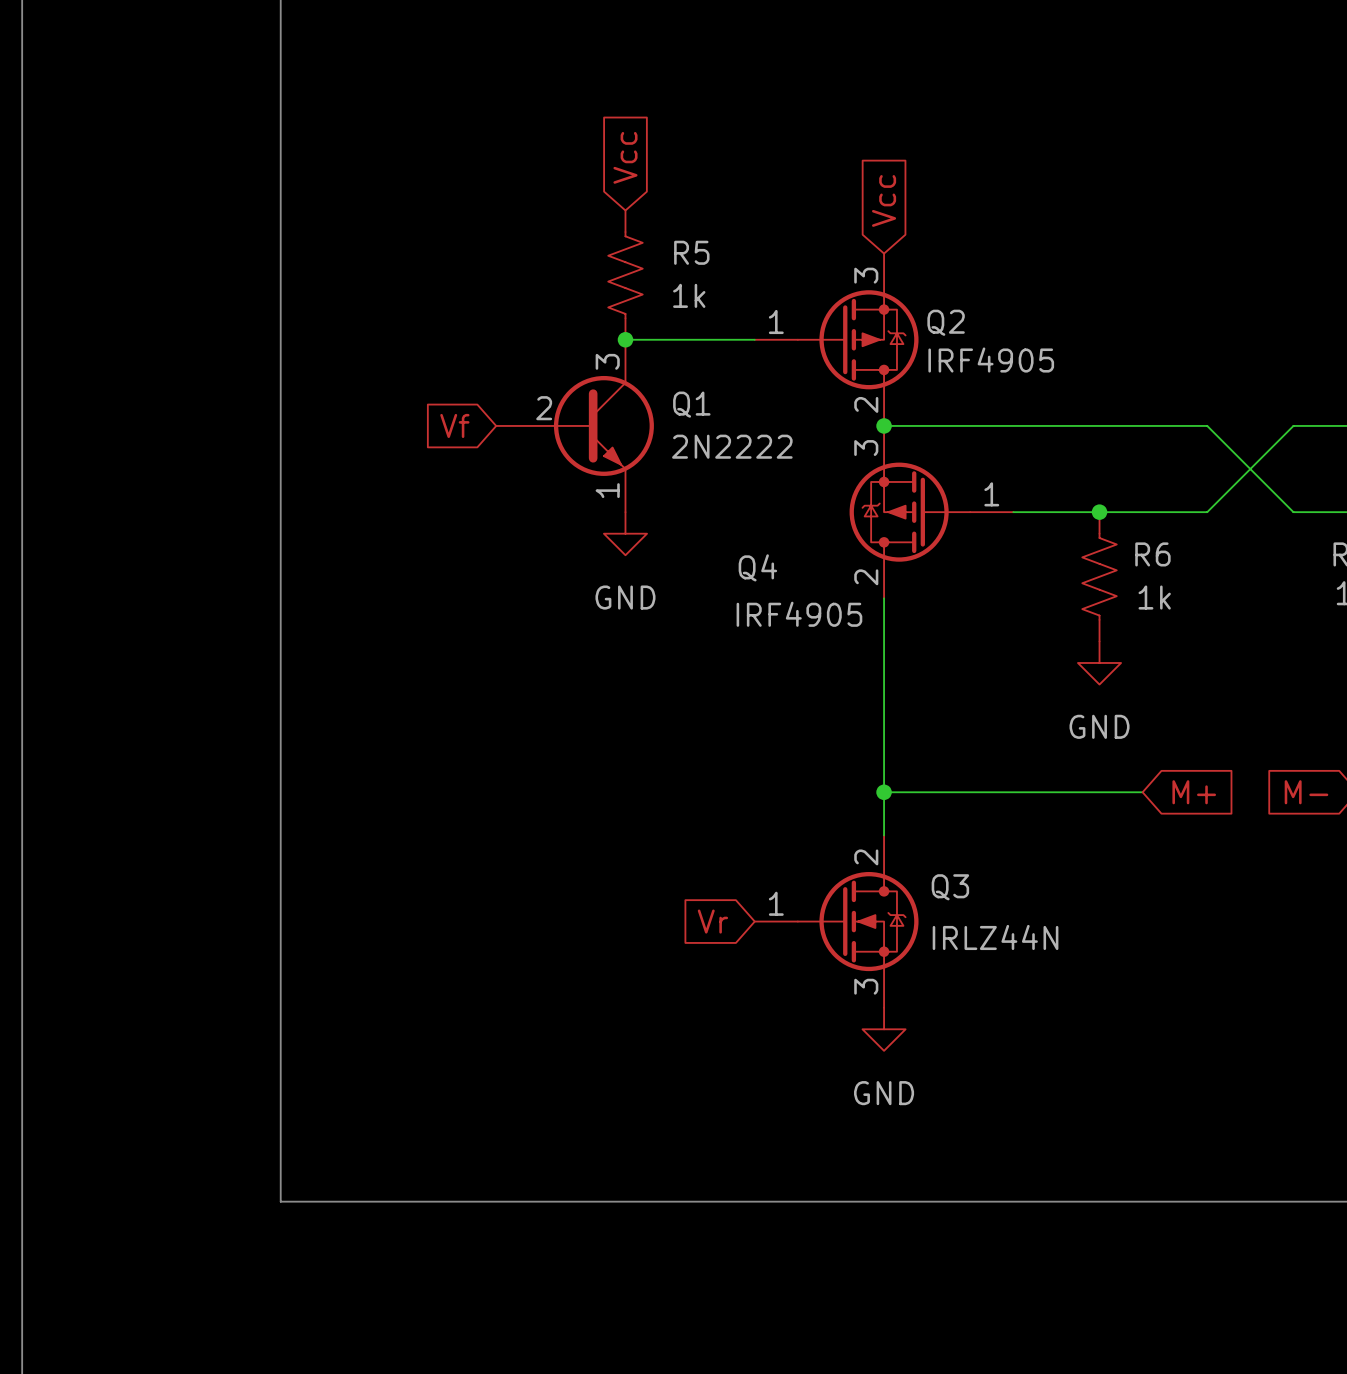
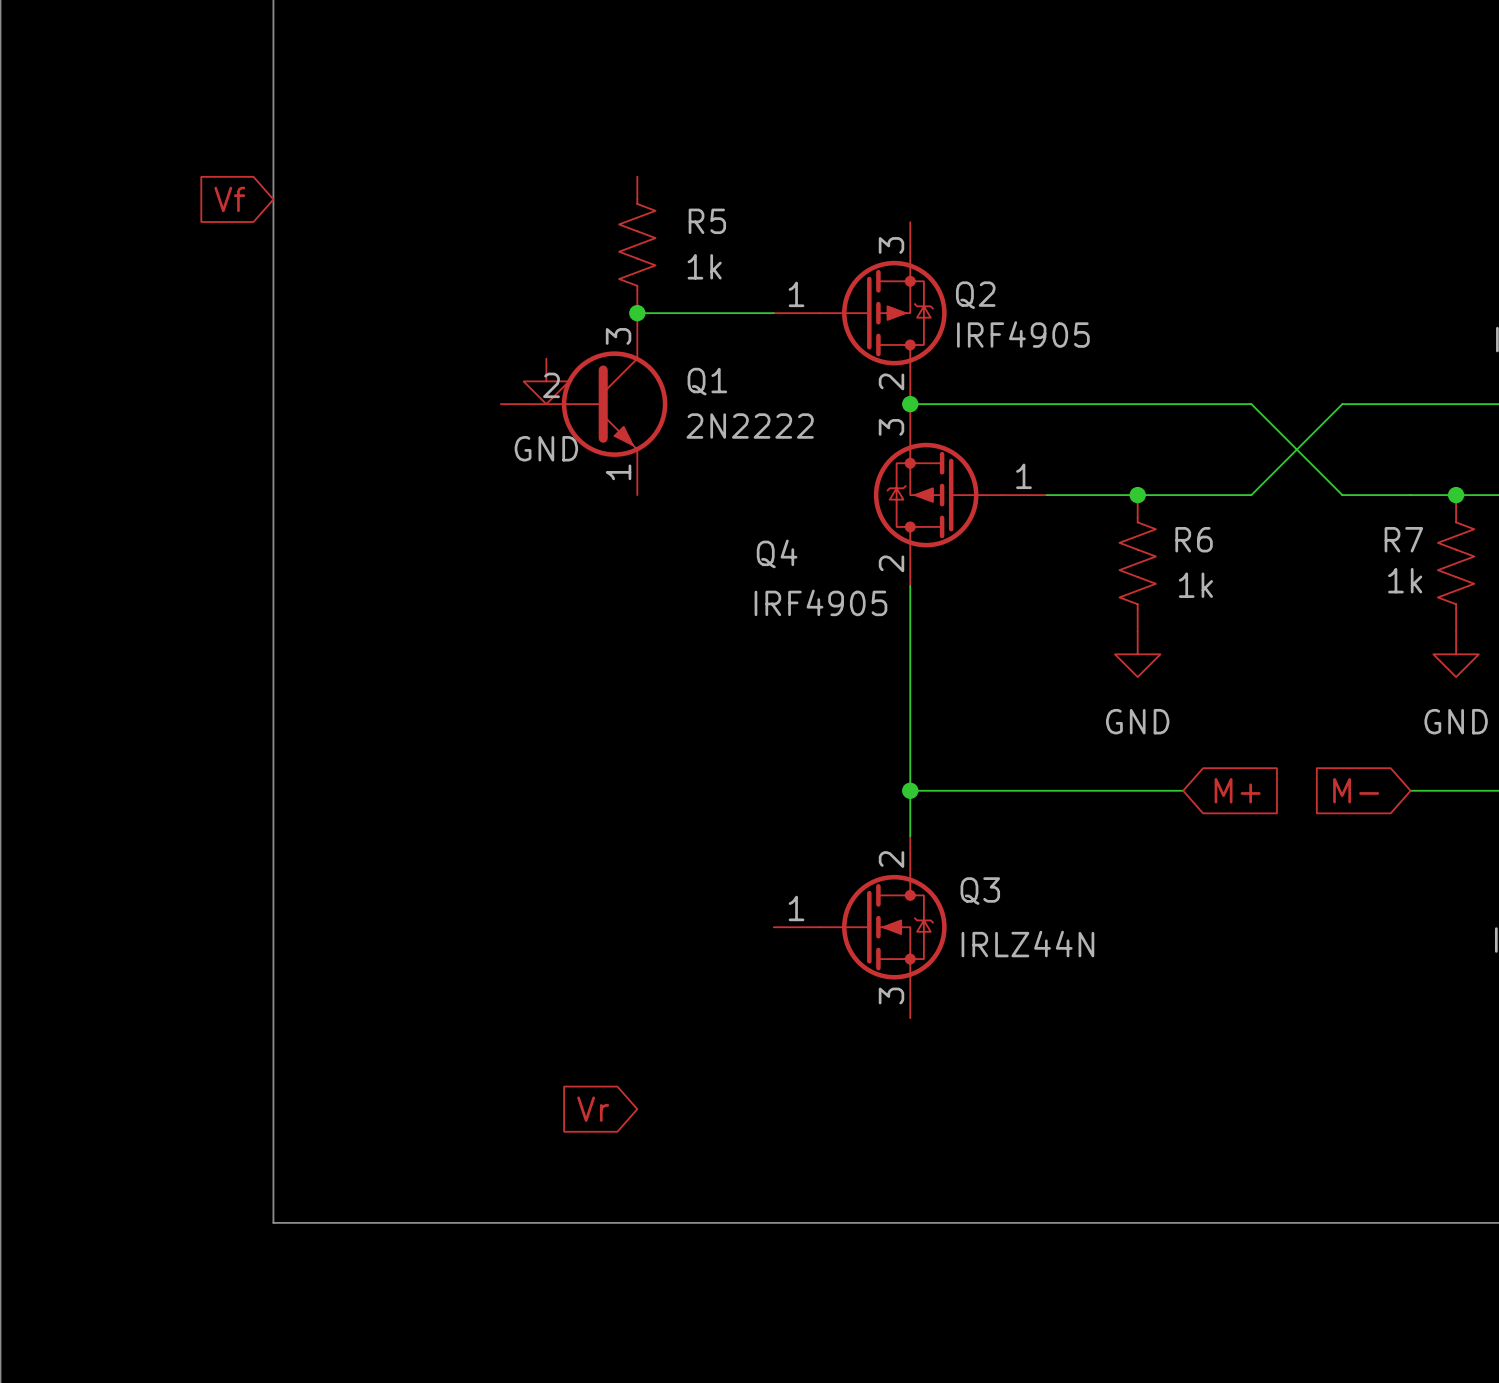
global label: Vcc (625, 157) -> none
global label: Vcc (884, 200) -> none
global label position: Vf (454, 425) -> Vf (229, 199)
power symbol position: GND (625, 533) -> GND (546, 381)
global label position: Vr (712, 921) -> Vr (593, 1109)
power symbol: GND (884, 1029) -> none

